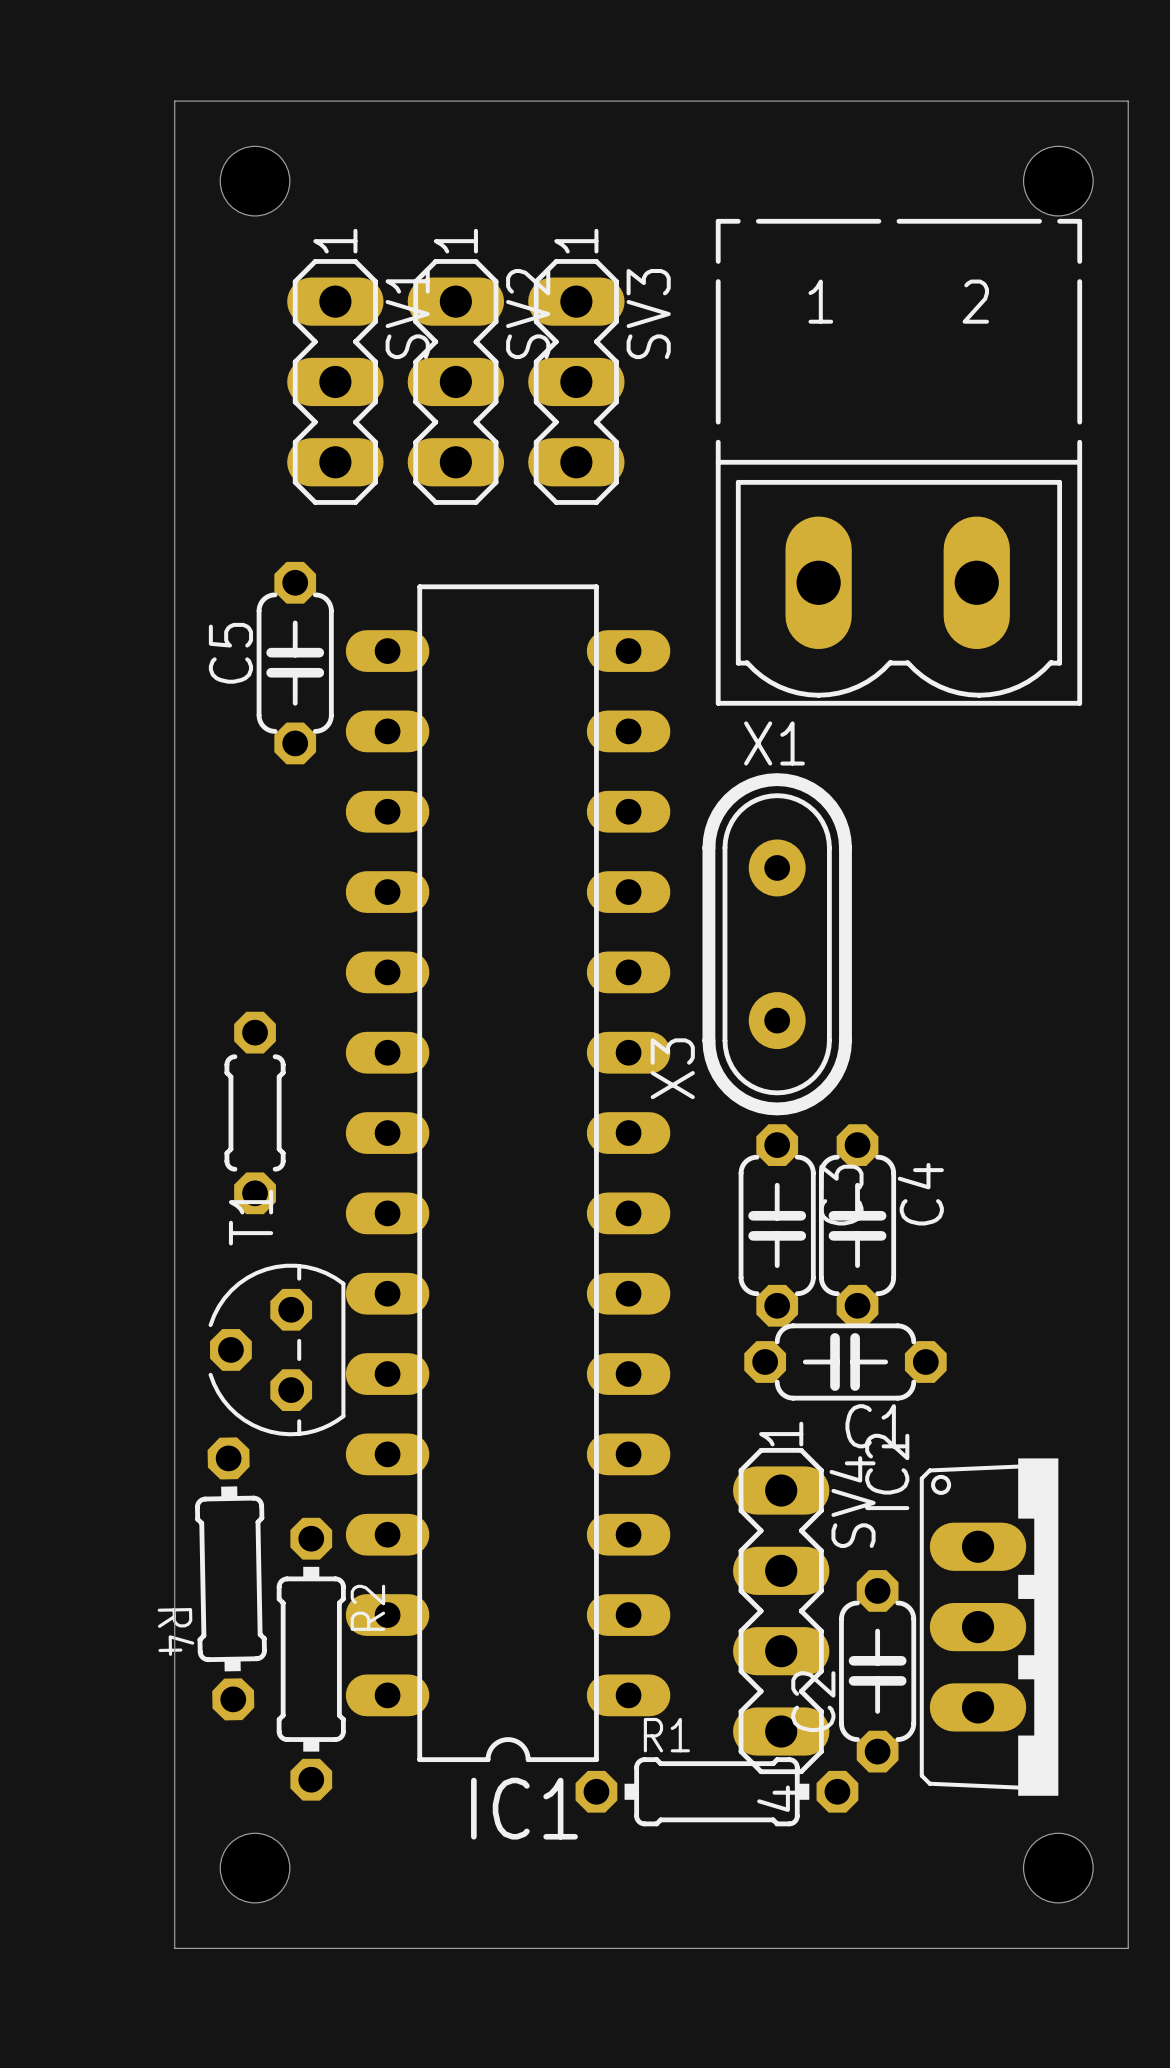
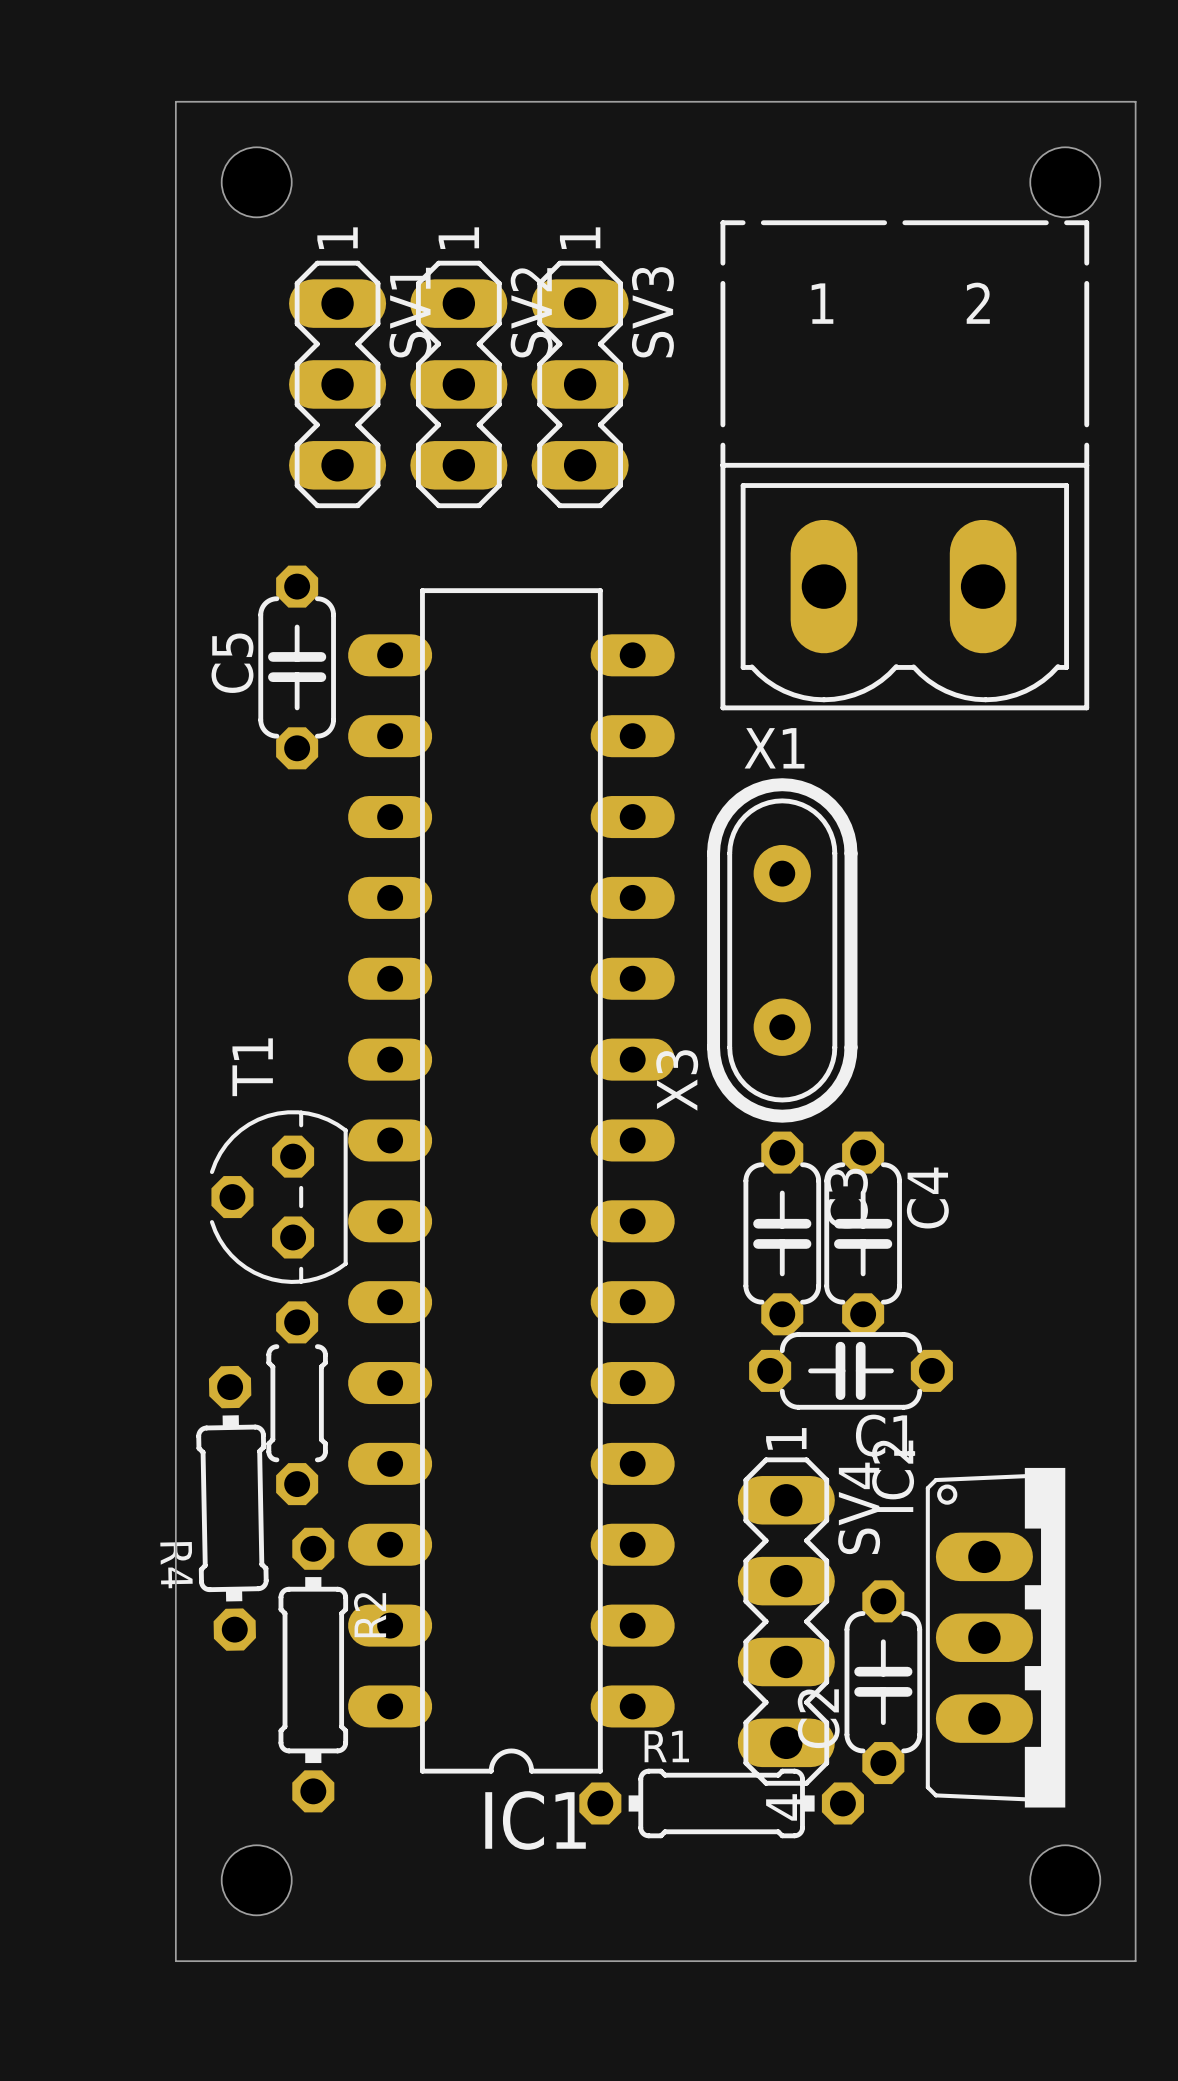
part position: (255, 1112) -> (297, 1403)
T1 position: (277, 1350) -> (278, 1197)
R4 position: (230, 1578) -> (232, 1508)

